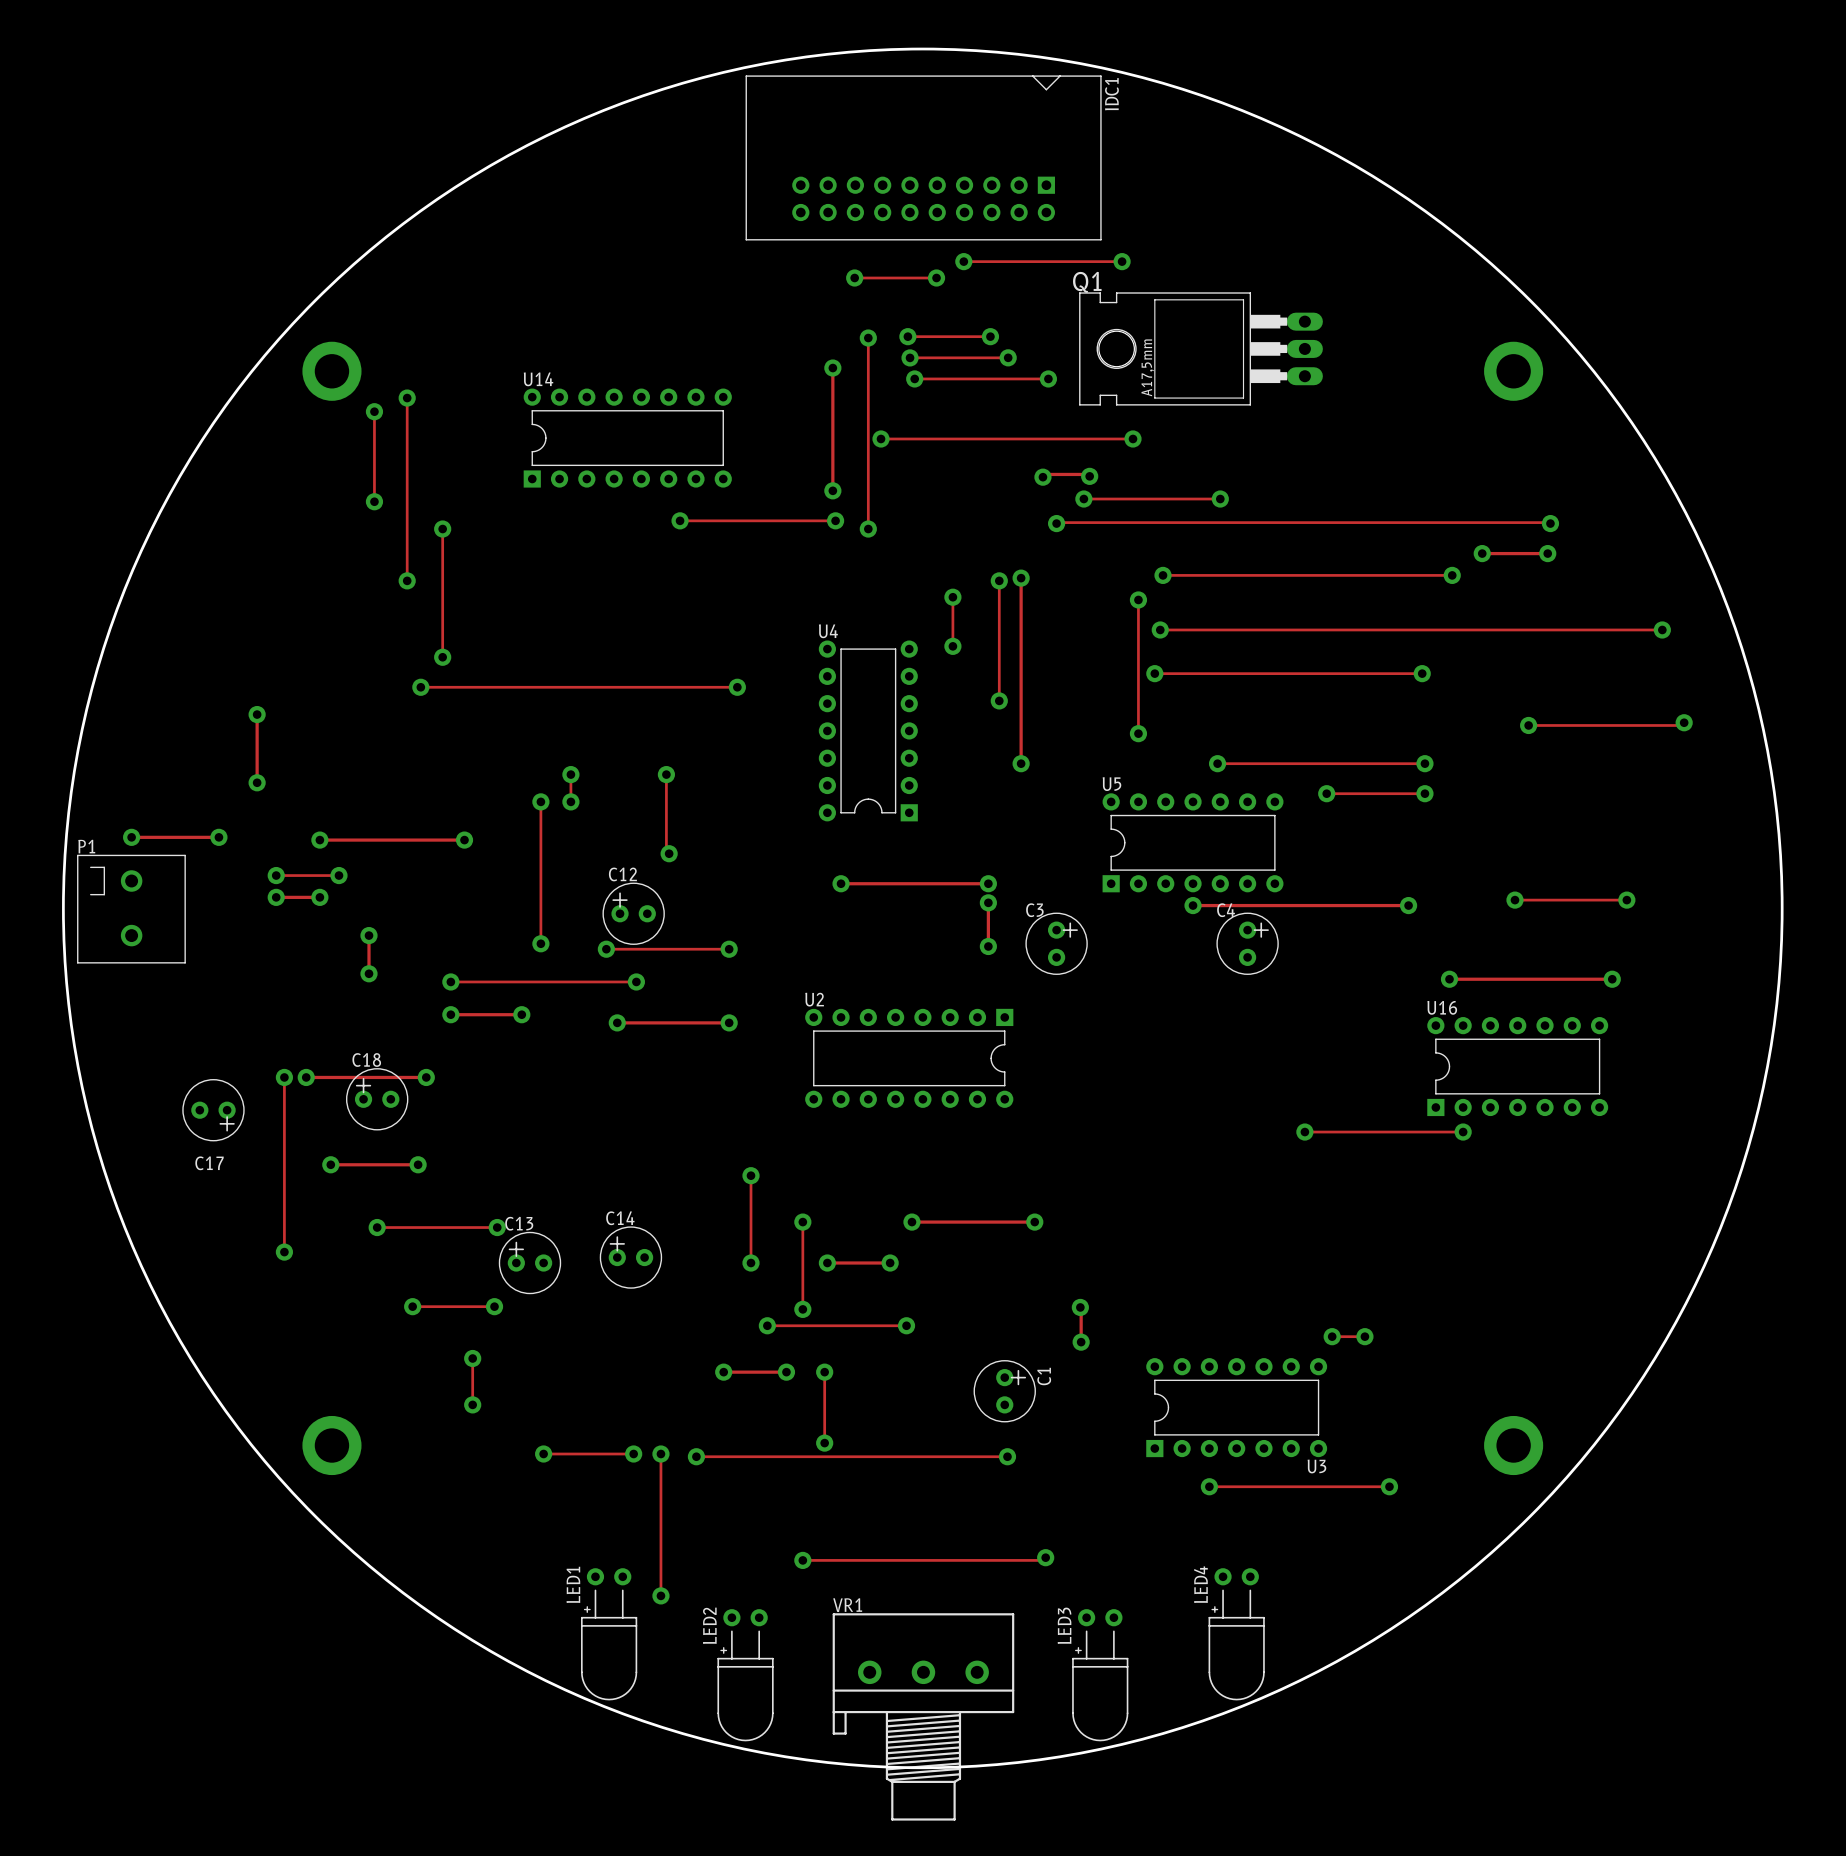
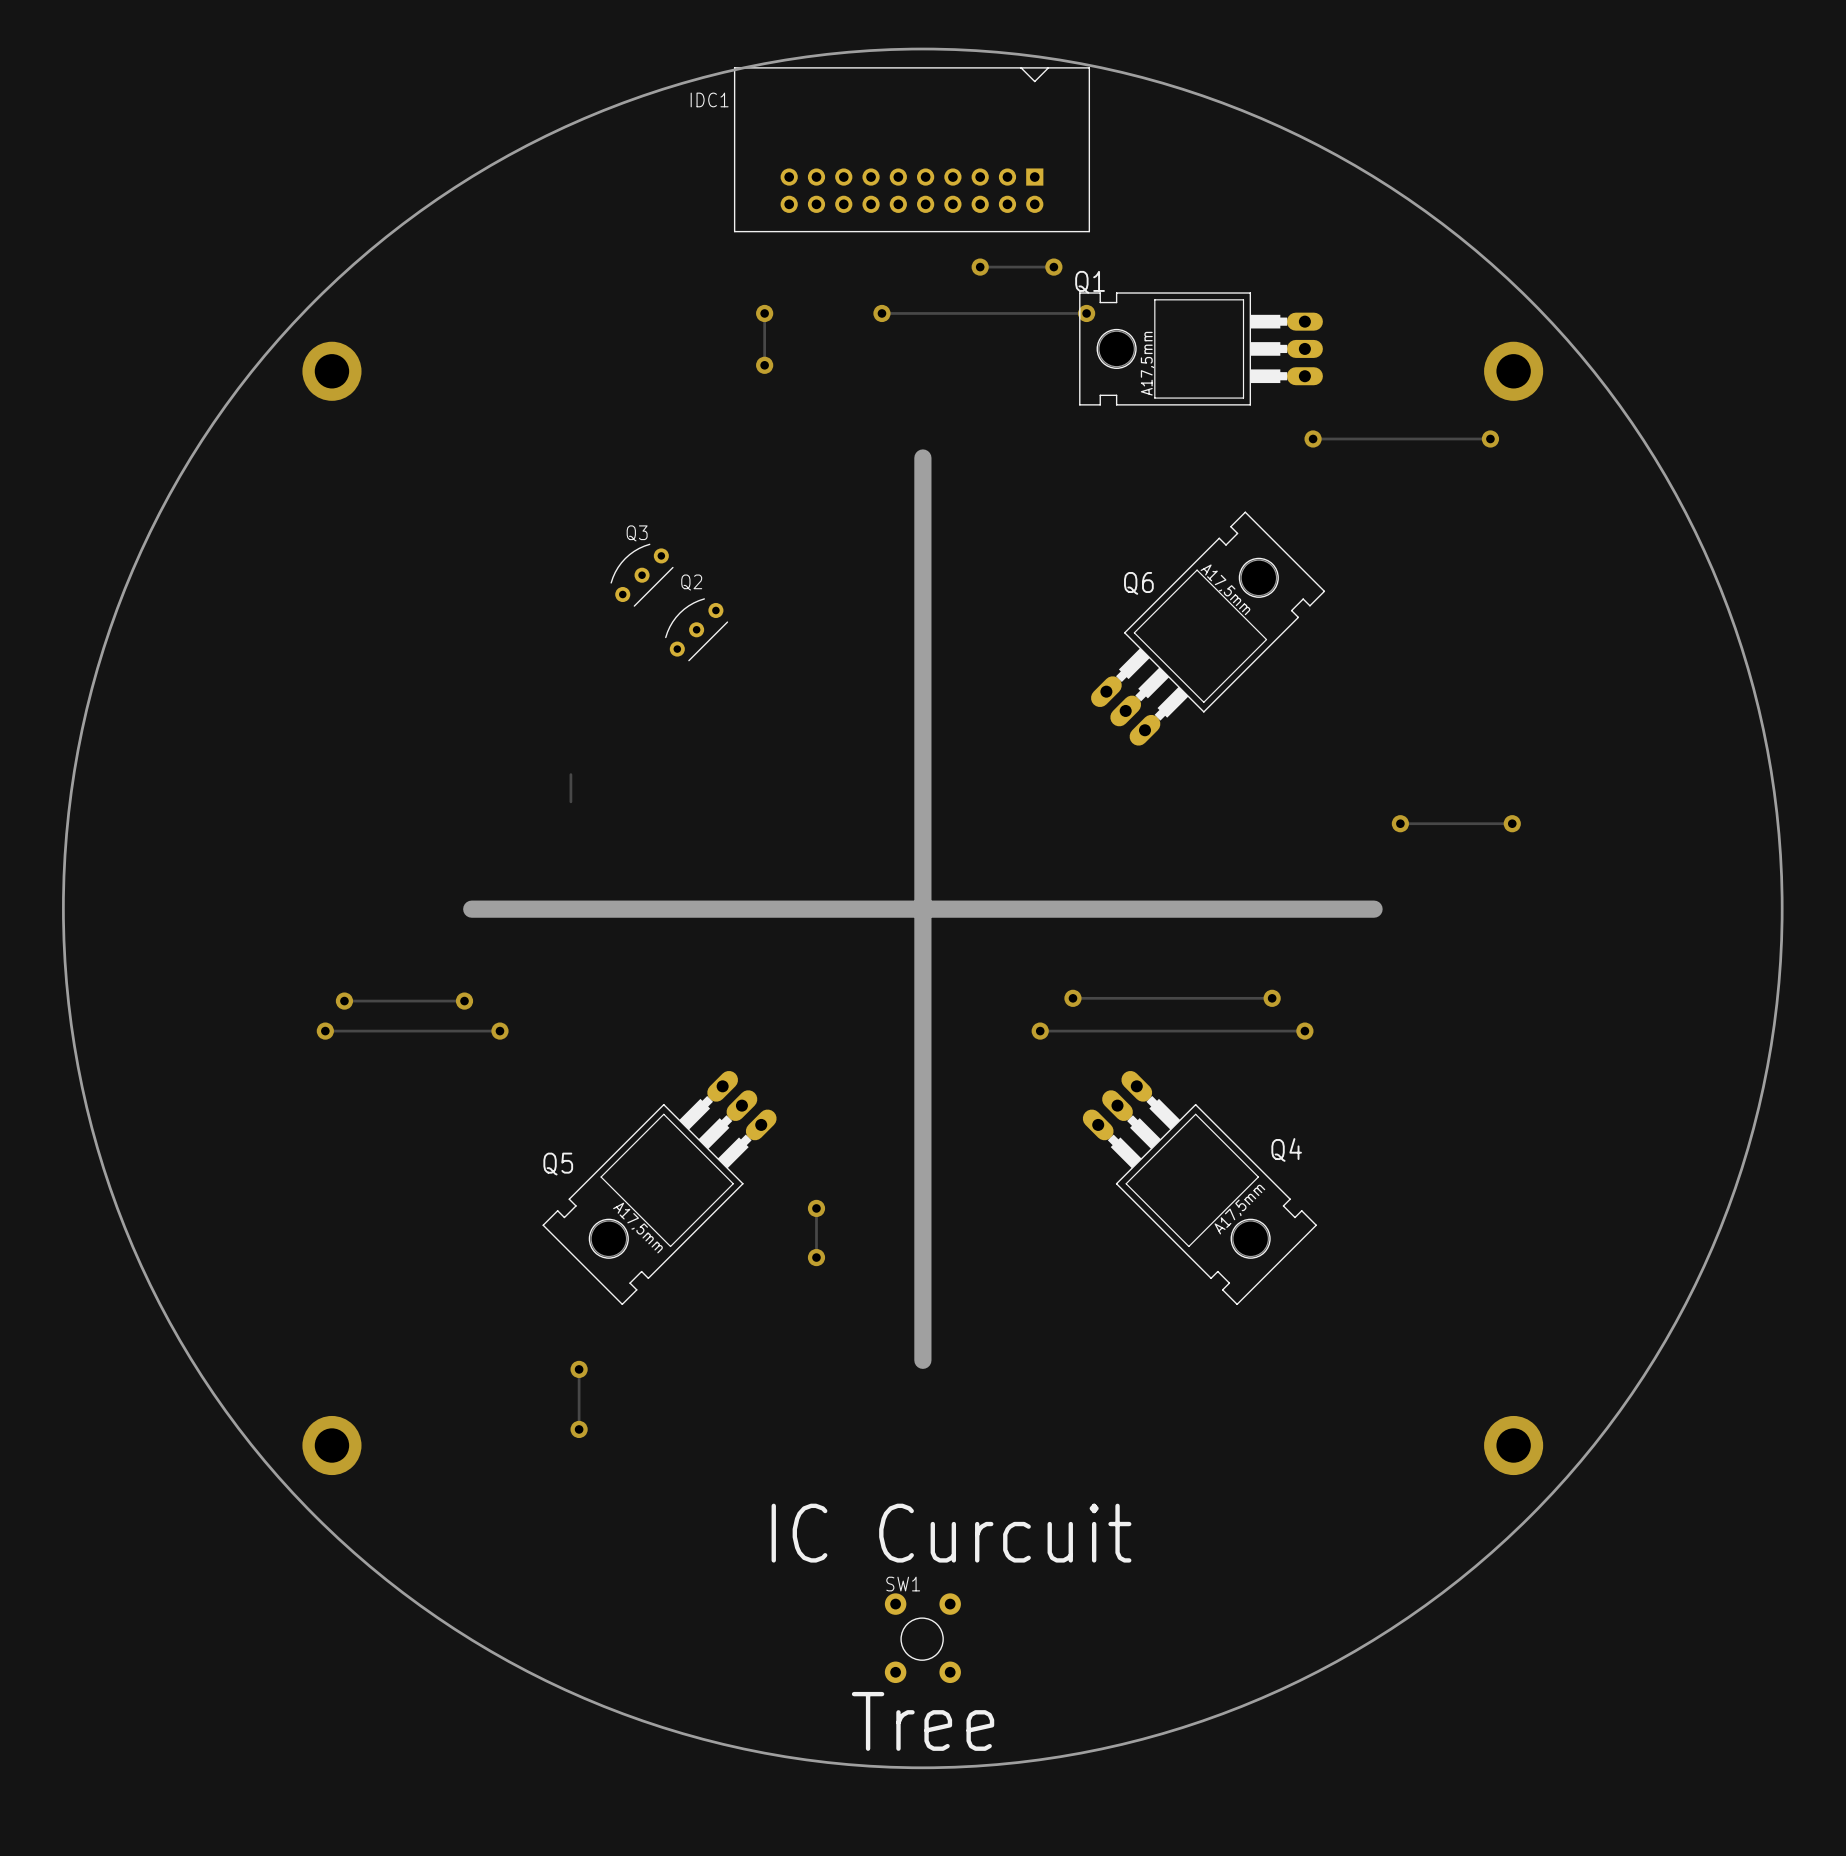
IDC1 name rotation: 0° (1111, 94) -> 90° clockwise (709, 99)
IDC1 name position: IDC1 (1111, 94) -> IDC1 (709, 99)
IDC1 position: (923, 157) -> (911, 149)
track: (963, 261) (1122, 261) -> none
via position: (963, 261) -> (980, 267)
via: (1122, 261) -> none
track: none -> (980, 267) (1053, 267)
via: none -> (1053, 267)
track: (854, 277) (936, 277) -> none
via: (854, 277) -> none
via: (936, 277) -> none
track: none -> (764, 313) (764, 365)
via: none -> (764, 313)
track: none -> (881, 313) (1086, 313)
via: none -> (881, 313)
via: none -> (1086, 313)
track: (907, 336) (990, 336) -> none
via: (907, 336) -> none
via: (990, 336) -> none
track: (868, 338) (868, 529) -> none
via: (868, 338) -> none
track: (910, 357) (1008, 357) -> none
via: (910, 357) -> none
via: (1008, 357) -> none
via: none -> (764, 365)
track: (832, 368) (832, 490) -> none
via: (832, 368) -> none
track: (914, 378) (1048, 378) -> none
via: (914, 378) -> none
via: (1048, 378) -> none
track: (407, 398) (407, 580) -> none
via: (407, 398) -> none
track: (374, 411) (374, 501) -> none
via: (374, 411) -> none
U14: (627, 438) -> none
track: (881, 438) (1132, 438) -> none
via: (881, 438) -> none
via: (1132, 438) -> none
track: none -> (1313, 438) (1490, 438)
via: none -> (1313, 438)
via: none -> (1490, 438)
track: (1089, 476) (1087, 474) (1045, 474) (1042, 477) -> none
via: (1089, 476) -> none
via: (1042, 477) -> none
via: (832, 490) -> none
track: (1083, 499) (1220, 499) -> none
via: (1083, 499) -> none
via: (1220, 499) -> none
via: (374, 501) -> none
track: (680, 520) (835, 520) -> none
via: (680, 520) -> none
via: (835, 520) -> none
track: (1056, 523) (1550, 523) -> none
via: (1056, 523) -> none
via: (1550, 523) -> none
track: (442, 529) (442, 657) -> none
via: (442, 529) -> none
via: (868, 529) -> none
track: (1482, 553) (1547, 553) -> none
via: (1482, 553) -> none
via: (1547, 553) -> none
Q3: none -> (642, 575)
track: (1163, 575) (1452, 575) -> none
via: (1163, 575) -> none
via: (1452, 575) -> none
track: (1021, 578) (1021, 763) -> none
via: (1021, 578) -> none
via: (407, 580) -> none
track: (999, 580) (999, 700) -> none
via: (999, 580) -> none
track: (952, 597) (952, 646) -> none
via: (952, 597) -> none
track: (1138, 599) (1138, 733) -> none
via: (1138, 599) -> none
Q6: none -> (1208, 628)
Q2: none -> (696, 629)
track: (1160, 629) (1662, 629) -> none
via: (1160, 629) -> none
via: (1662, 629) -> none
via: (952, 646) -> none
via: (442, 657) -> none
track: (1154, 673) (1422, 673) -> none
via: (1154, 673) -> none
via: (1422, 673) -> none
track: (420, 687) (737, 687) -> none
via: (420, 687) -> none
via: (737, 687) -> none
via: (999, 700) -> none
track: (257, 714) (257, 782) -> none
via: (257, 714) -> none
track: (1684, 722) (1681, 725) (1528, 725) -> none
via: (1684, 722) -> none
via: (1528, 725) -> none
U4: (868, 730) -> none
via: (1138, 733) -> none
via: (1021, 763) -> none
track: (1217, 763) (1424, 763) -> none
via: (1217, 763) -> none
via: (1424, 763) -> none
via: (570, 774) -> none
track: (666, 774) (666, 850) (669, 853) -> none
via: (666, 774) -> none
via: (257, 782) -> none
track: (1326, 793) (1424, 793) -> none
via: (1326, 793) -> none
via: (1424, 793) -> none
track: (540, 801) (540, 943) -> none
via: (540, 801) -> none
via: (570, 801) -> none
via: none -> (1400, 823)
via: none -> (1512, 823)
track: (131, 837) (218, 837) -> none
via: (131, 837) -> none
via: (218, 837) -> none
track: (319, 840) (464, 840) -> none
via: (319, 840) -> none
via: (464, 840) -> none
U5: (1193, 842) -> none
via: (669, 853) -> none
track: (276, 875) (338, 875) -> none
via: (276, 875) -> none
via: (338, 875) -> none
track: (841, 883) (988, 883) -> none
via: (841, 883) -> none
via: (988, 883) -> none
track: (276, 897) (319, 897) -> none
via: (276, 897) -> none
via: (319, 897) -> none
track: (1514, 900) (1626, 900) -> (1400, 823) (1512, 823)
via: (1514, 900) -> none
via: (1626, 900) -> none
track: (988, 902) (988, 946) -> none
via: (988, 902) -> none
track: (1193, 905) (1408, 905) -> none
via: (1193, 905) -> none
via: (1408, 905) -> none
P1: (131, 909) -> none
part: none -> (922, 909)
C12: (633, 913) -> none
track: (369, 935) (369, 973) -> none
via: (369, 935) -> none
via: (540, 943) -> none
C3: (1056, 943) -> none
C4: (1247, 943) -> none
via: (988, 946) -> none
track: (606, 949) (729, 949) -> none
via: (606, 949) -> none
via: (729, 949) -> none
via: (369, 973) -> none
track: (1449, 979) (1612, 979) -> none
via: (1449, 979) -> none
via: (1612, 979) -> none
track: (450, 981) (636, 981) -> none
via: (450, 981) -> none
via: (636, 981) -> none
track: none -> (1072, 998) (1272, 998)
via: none -> (1072, 998)
via: none -> (1272, 998)
via: none -> (344, 1001)
via: none -> (464, 1001)
track: (450, 1014) (521, 1014) -> none
via: (450, 1014) -> none
via: (521, 1014) -> none
track: (617, 1022) (729, 1022) -> none
via: (617, 1022) -> none
via: (729, 1022) -> none
track: none -> (325, 1031) (499, 1031)
via: none -> (325, 1031)
via: none -> (499, 1031)
track: none -> (1040, 1031) (1304, 1031)
via: none -> (1040, 1031)
via: none -> (1304, 1031)
U2: (909, 1058) -> none
U16: (1517, 1066) -> none
track: (284, 1077) (284, 1252) -> none
via: (284, 1077) -> none
track: (306, 1077) (426, 1077) -> (344, 1001) (464, 1001)
via: (306, 1077) -> none
via: (426, 1077) -> none
C18: (377, 1099) -> none
C17: (213, 1110) -> none
track: (1304, 1132) (1463, 1132) -> none
via: (1304, 1132) -> none
via: (1463, 1132) -> none
track: (330, 1164) (418, 1164) -> none
via: (330, 1164) -> none
via: (418, 1164) -> none
track: (751, 1175) (751, 1263) -> none
via: (751, 1175) -> none
Q5: none -> (659, 1188)
Q4: none -> (1199, 1188)
track: none -> (816, 1208) (816, 1257)
via: none -> (816, 1208)
track: (802, 1222) (802, 1309) -> none
via: (802, 1222) -> none
track: (911, 1222) (1034, 1222) -> none
via: (911, 1222) -> none
via: (1034, 1222) -> none
track: (377, 1227) (497, 1227) -> none
via: (377, 1227) -> none
via: (497, 1227) -> none
via: (284, 1252) -> none
C14: (630, 1257) -> none
C13: (529, 1263) -> none
via: (751, 1263) -> none
track: (827, 1263) (890, 1263) -> none
via position: (827, 1263) -> (816, 1257)
via: (890, 1263) -> none
track: (412, 1306) (494, 1306) -> none
via: (412, 1306) -> none
via: (494, 1306) -> none
track: (1080, 1307) (1081, 1342) -> none
via: (1080, 1307) -> none
via: (802, 1309) -> none
track: (767, 1325) (906, 1325) -> none
via: (767, 1325) -> none
via: (906, 1325) -> none
track: (1332, 1336) (1364, 1336) -> none
via: (1332, 1336) -> none
via: (1364, 1336) -> none
via: (1081, 1342) -> none
track: (472, 1358) (472, 1404) -> none
via: (472, 1358) -> none
track: none -> (579, 1369) (579, 1429)
via: none -> (579, 1369)
track: (723, 1372) (786, 1372) -> none
via: (723, 1372) -> none
via: (786, 1372) -> none
track: (824, 1372) (824, 1443) -> none
via: (824, 1372) -> none
C1: (1004, 1391) -> none
via: (472, 1404) -> none
U3: (1236, 1407) -> none
via: none -> (579, 1429)
via: (824, 1443) -> none
track: (543, 1454) (633, 1454) -> none
via: (543, 1454) -> none
via: (633, 1454) -> none
track: (660, 1454) (660, 1595) -> none
via: (660, 1454) -> none
track: (696, 1456) (1007, 1456) -> none
via: (696, 1456) -> none
via: (1007, 1456) -> none
track: (1209, 1486) (1389, 1486) -> none
via: (1209, 1486) -> none
via: (1389, 1486) -> none
text: none -> IC Curcuit (951, 1533)
track: (1045, 1557) (1042, 1560) (802, 1560) -> none
via: (1045, 1557) -> none
via: (802, 1560) -> none
via: (660, 1595) -> none
LED1: (609, 1634) -> none
LED4: (1236, 1634) -> none
SW1: none -> (922, 1638)
LED2: (745, 1675) -> none
LED3: (1100, 1675) -> none
VR1: (923, 1716) -> none
text: none -> Tree (923, 1721)

